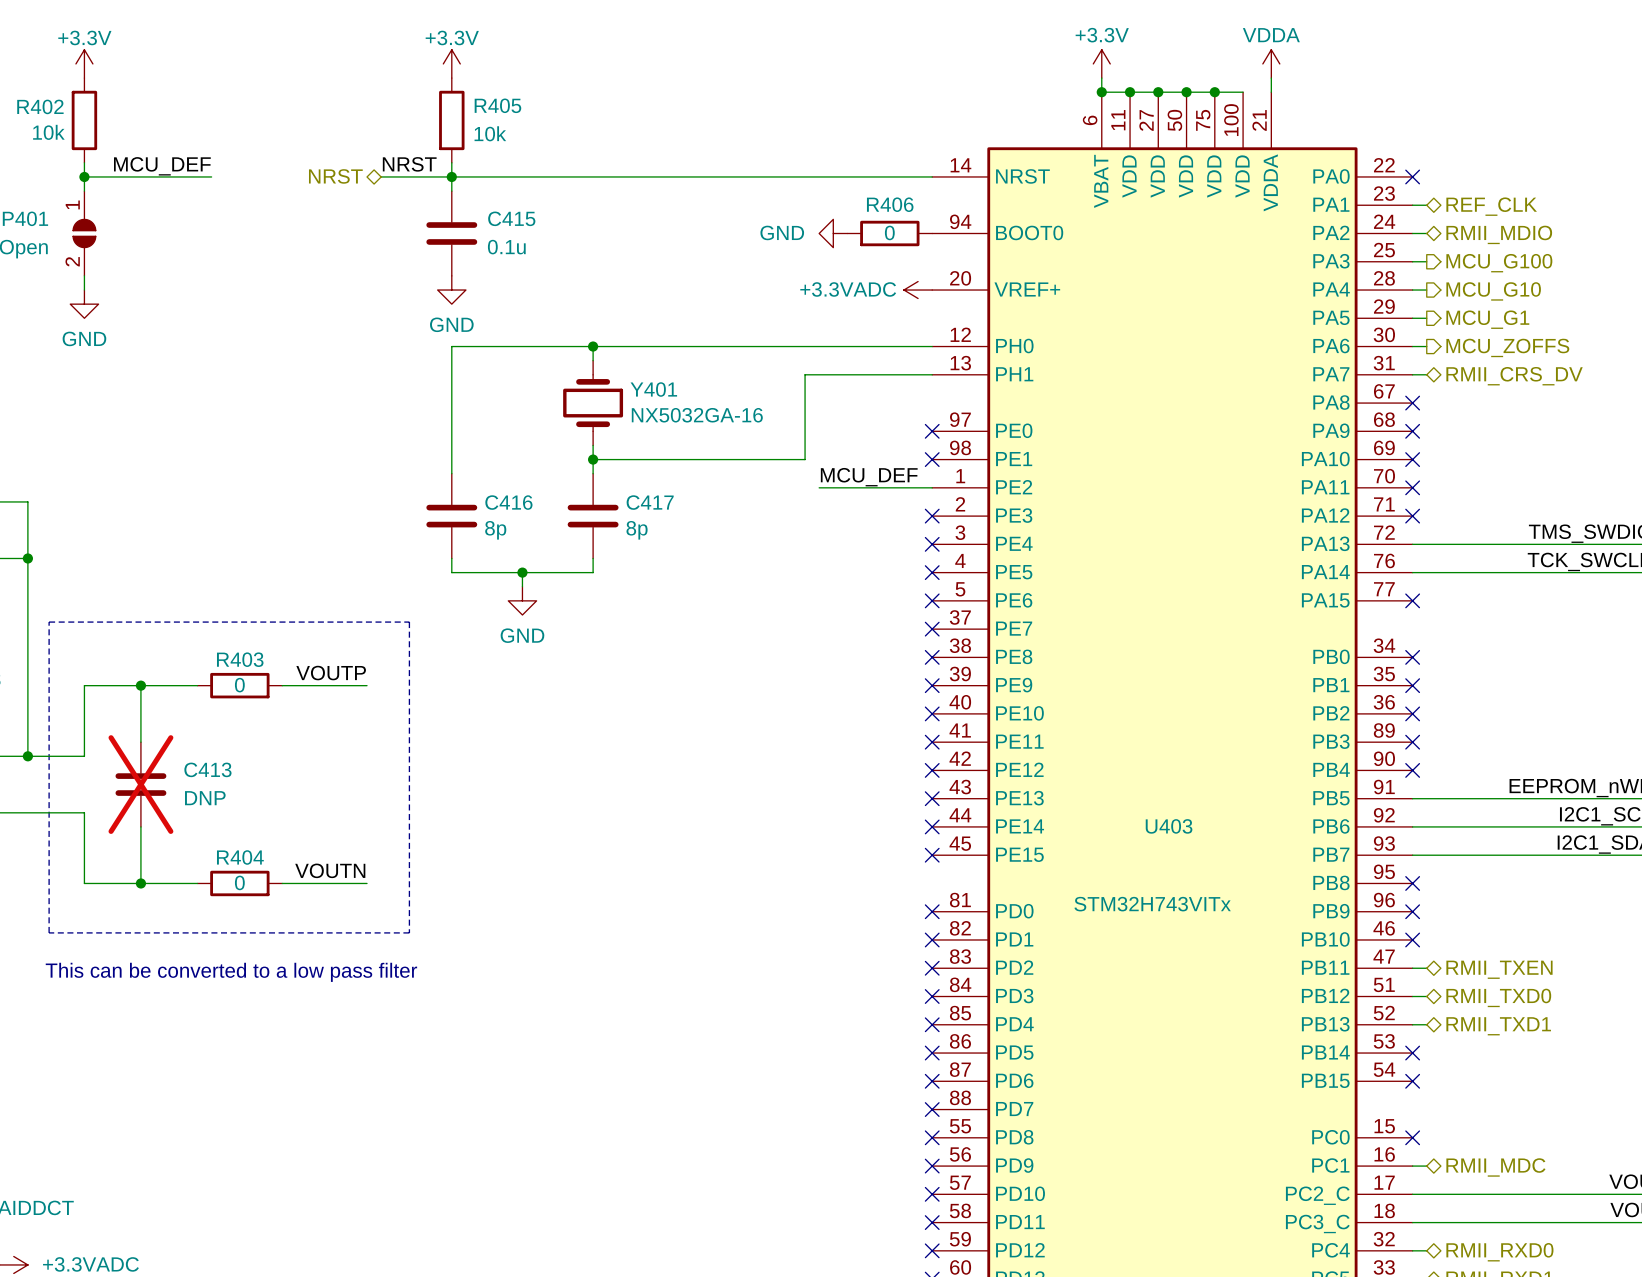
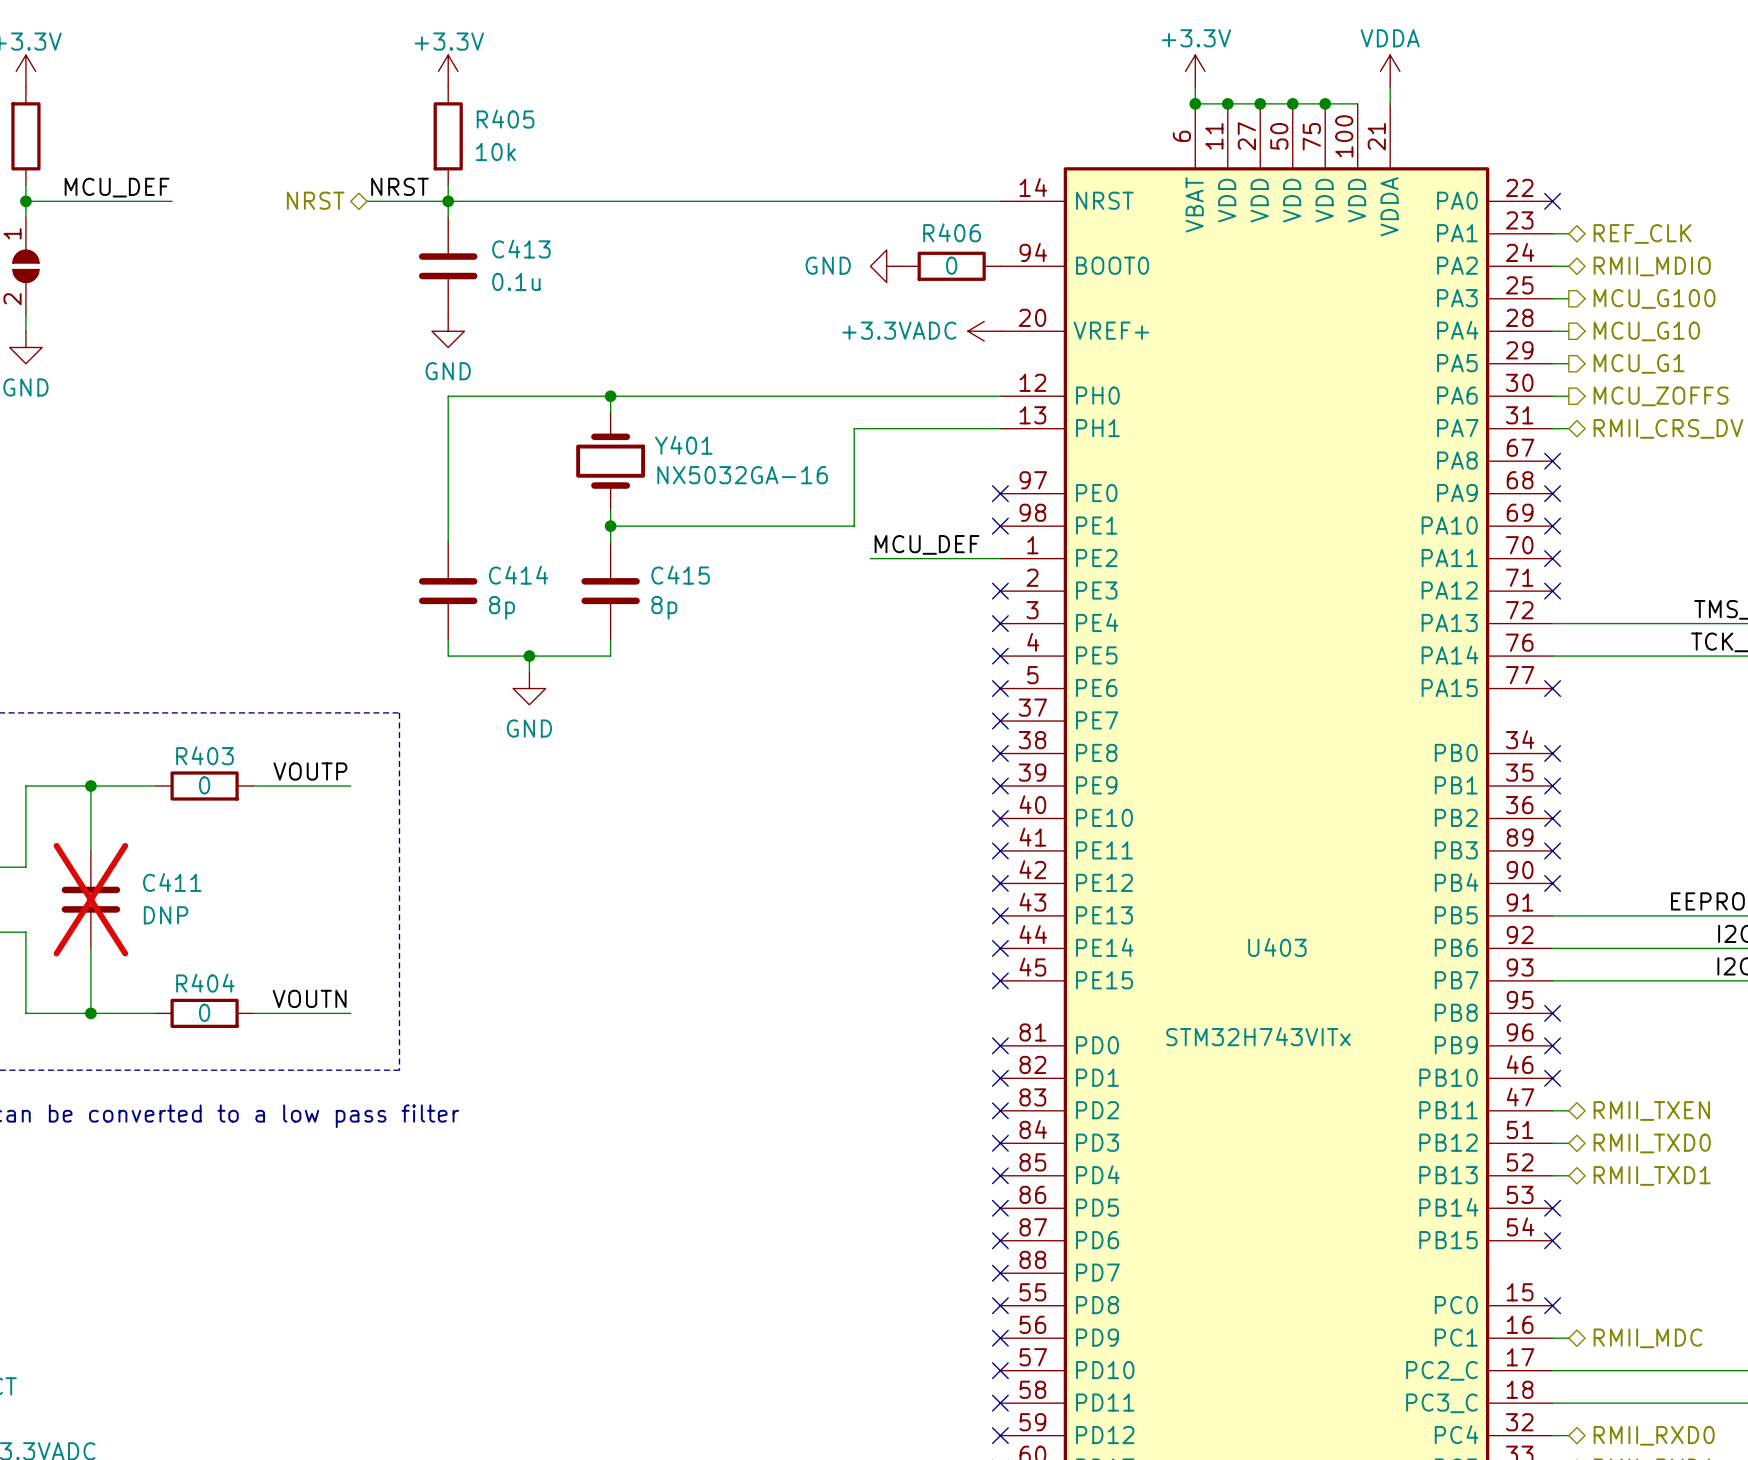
C415 name: C415 (511, 218) -> C413 (521, 249)
C416 name: C416 (508, 502) -> C414 (518, 575)
C417 name: C417 (650, 502) -> C415 (680, 575)
C413 name: C413 (207, 769) -> C411 (172, 882)

